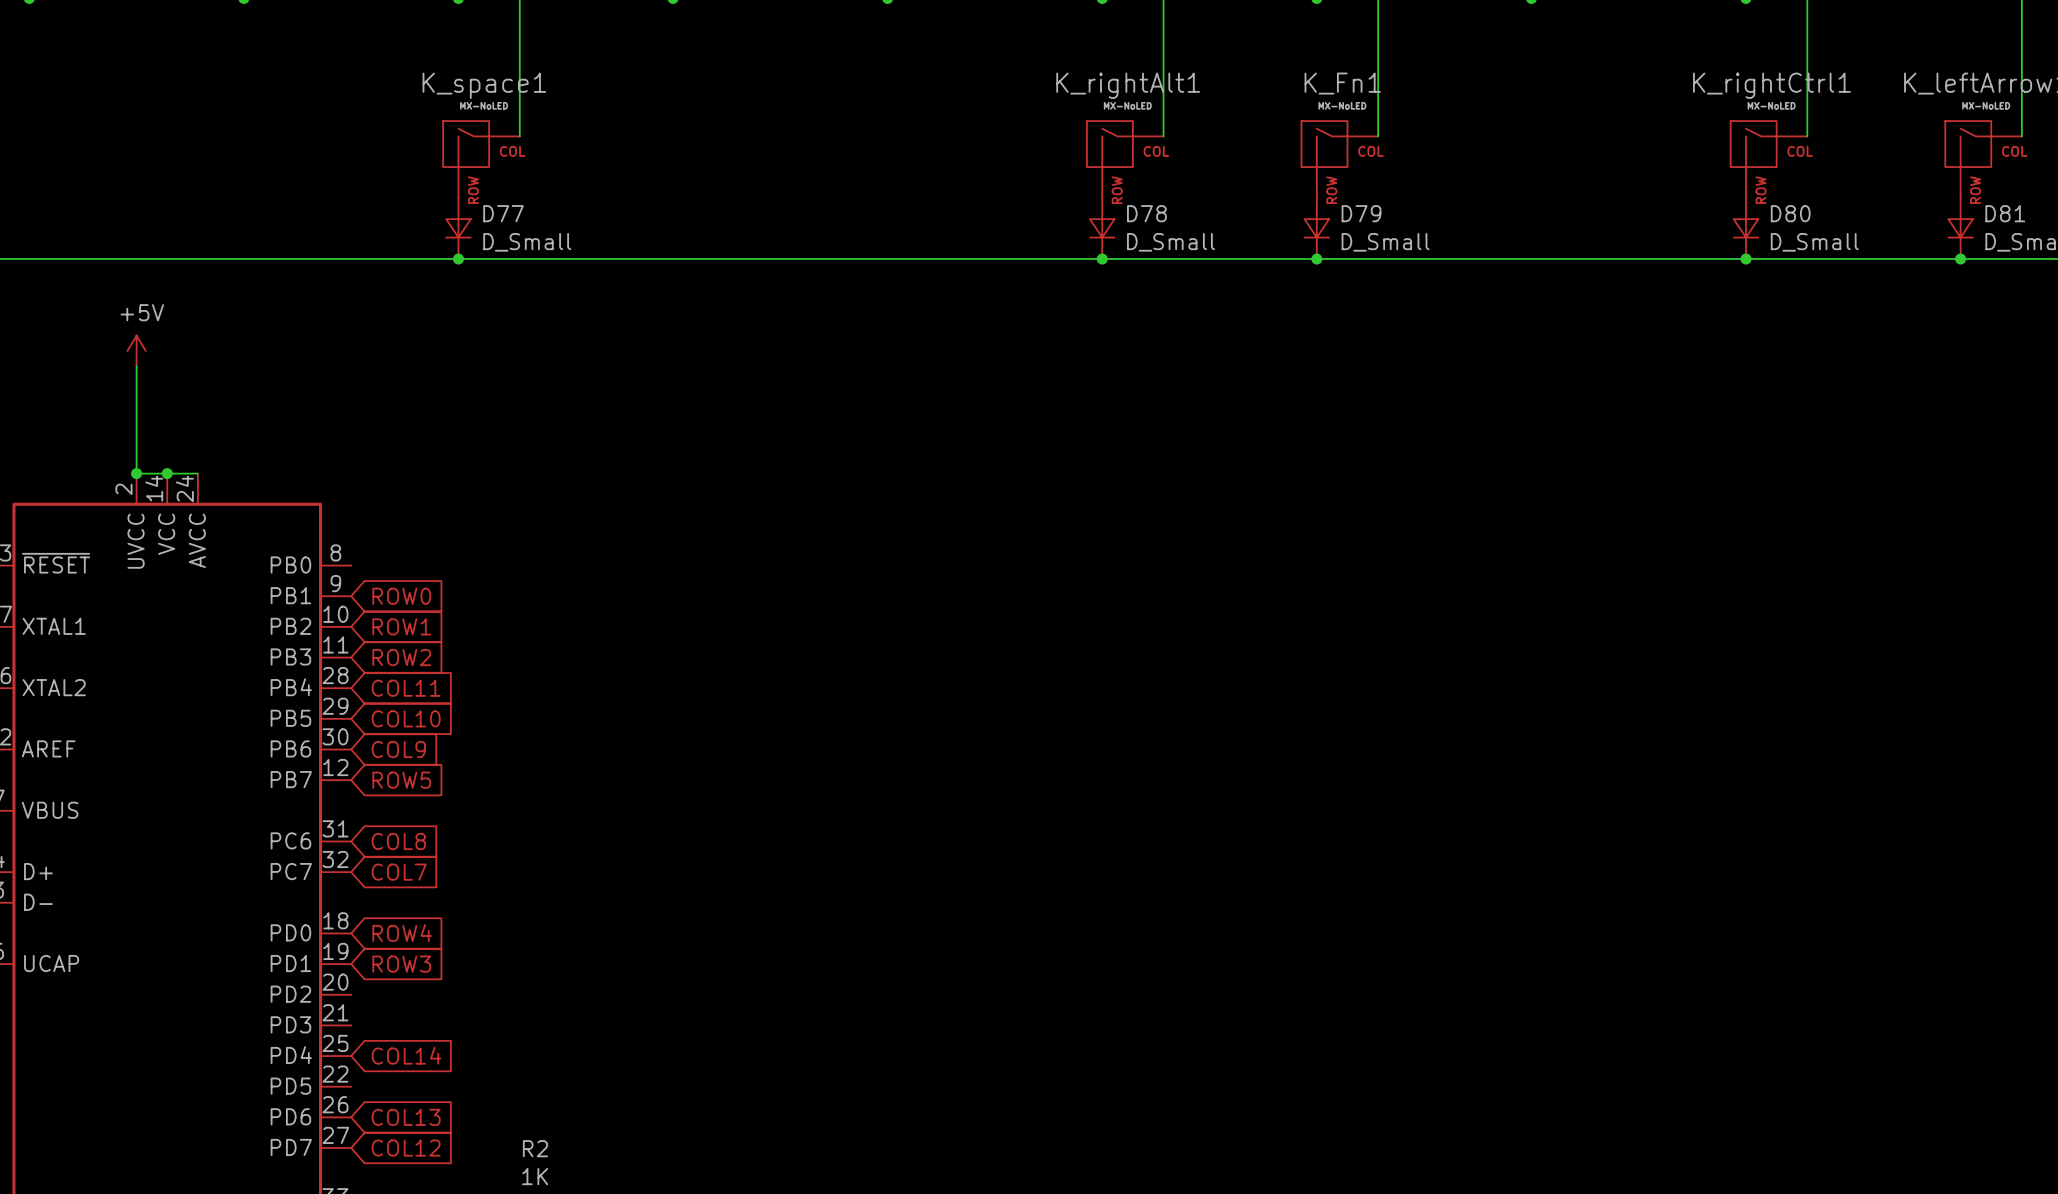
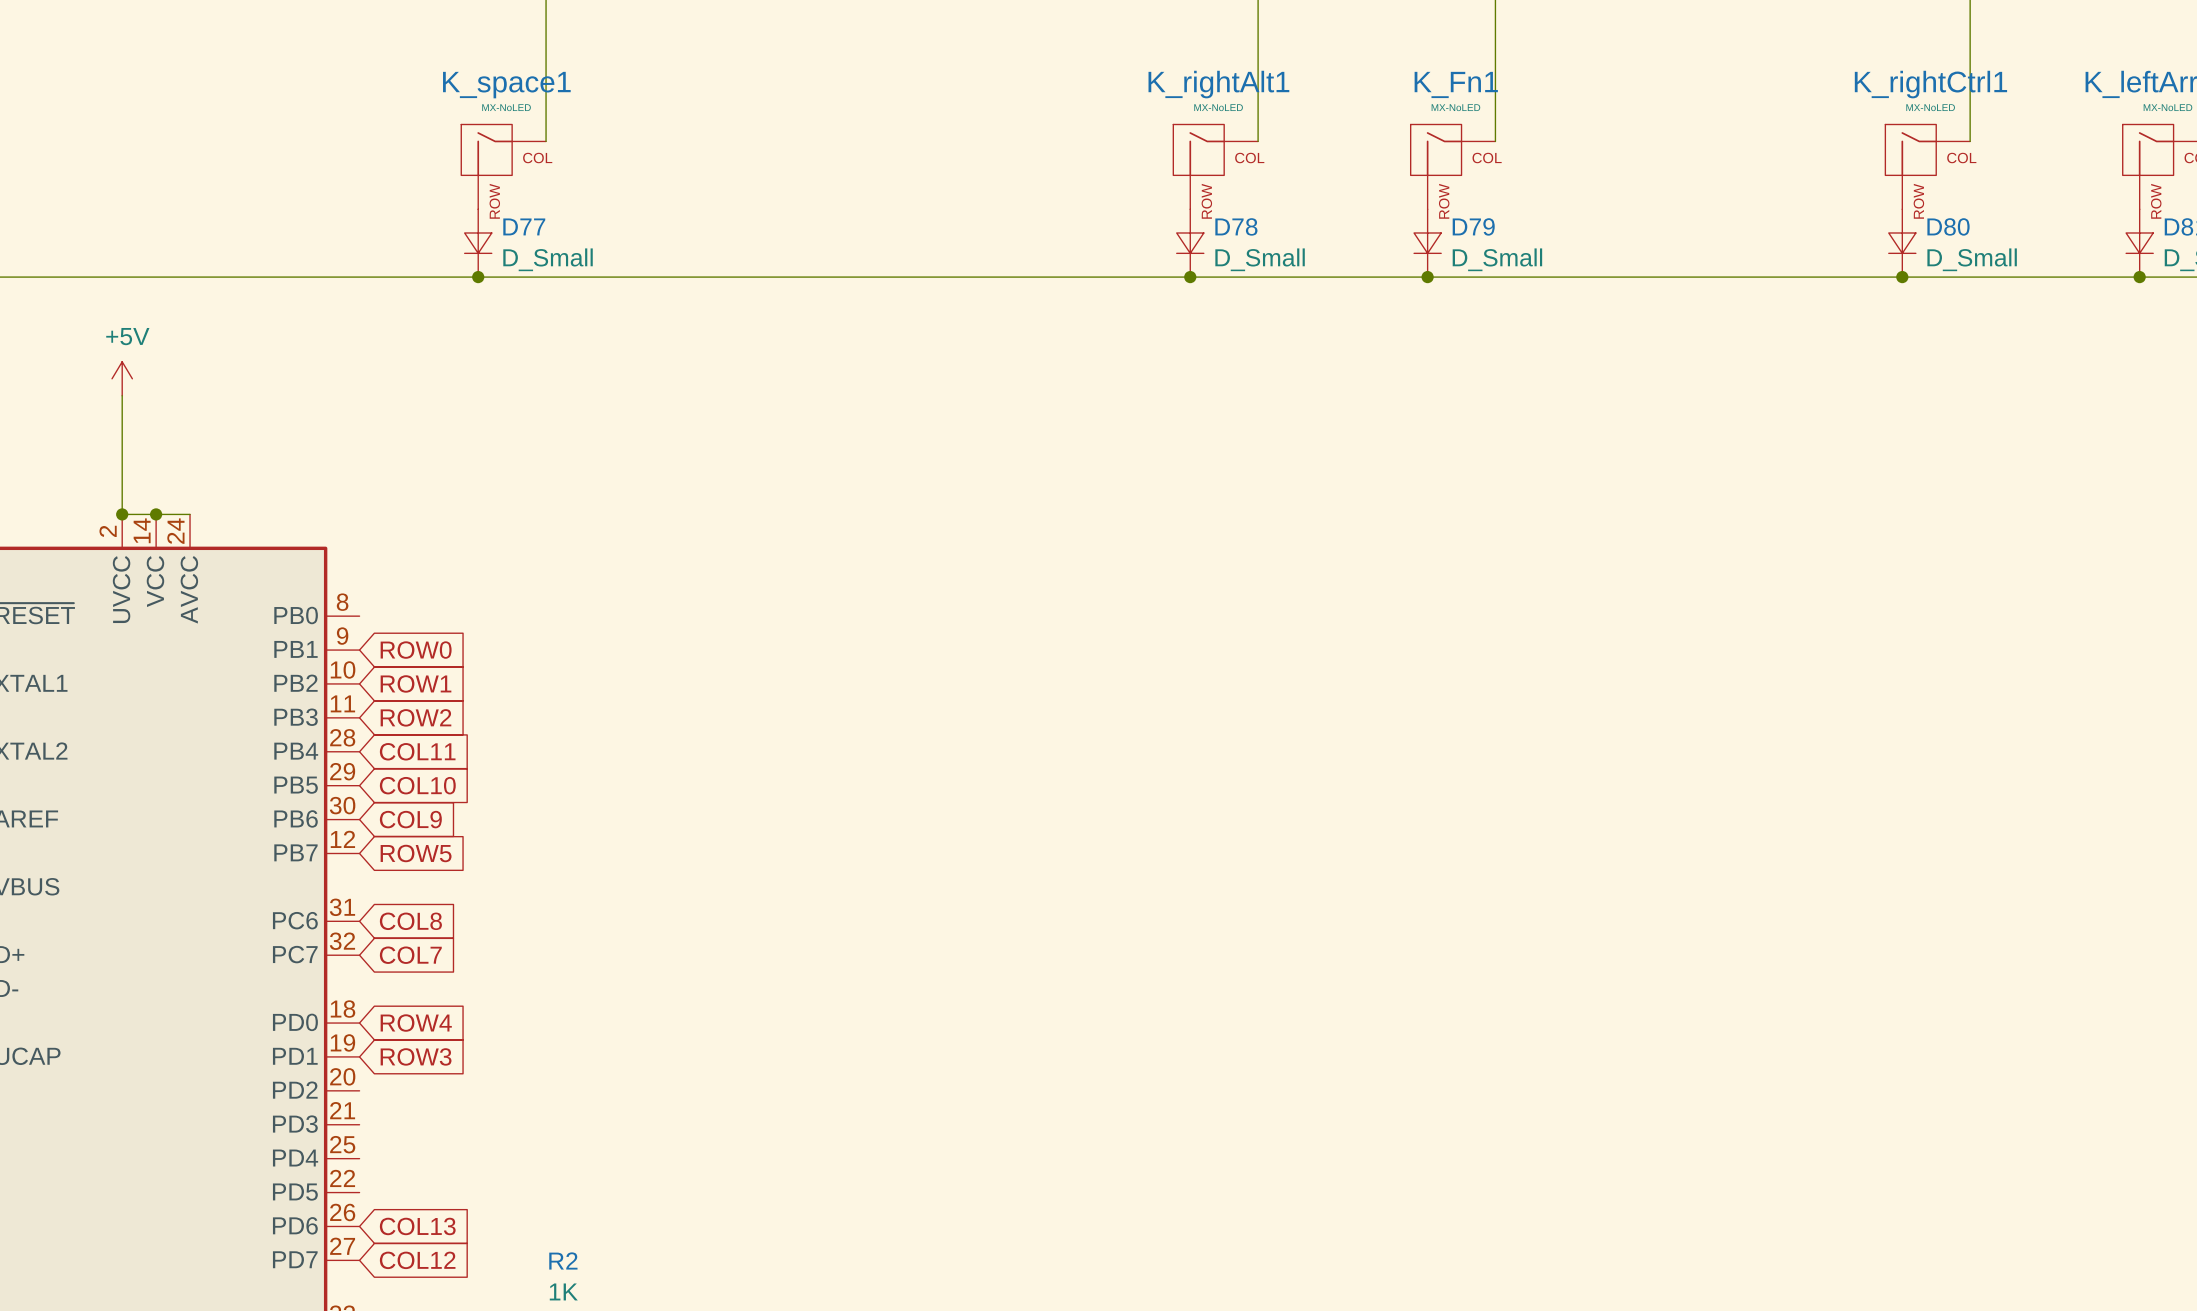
global label: COL14 (406, 1055) -> none

